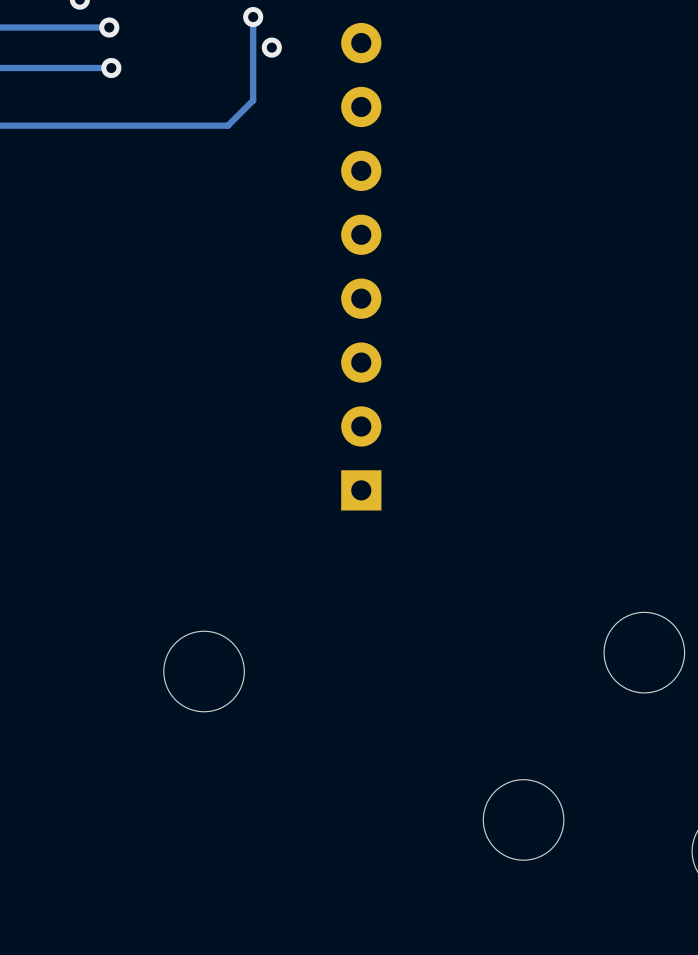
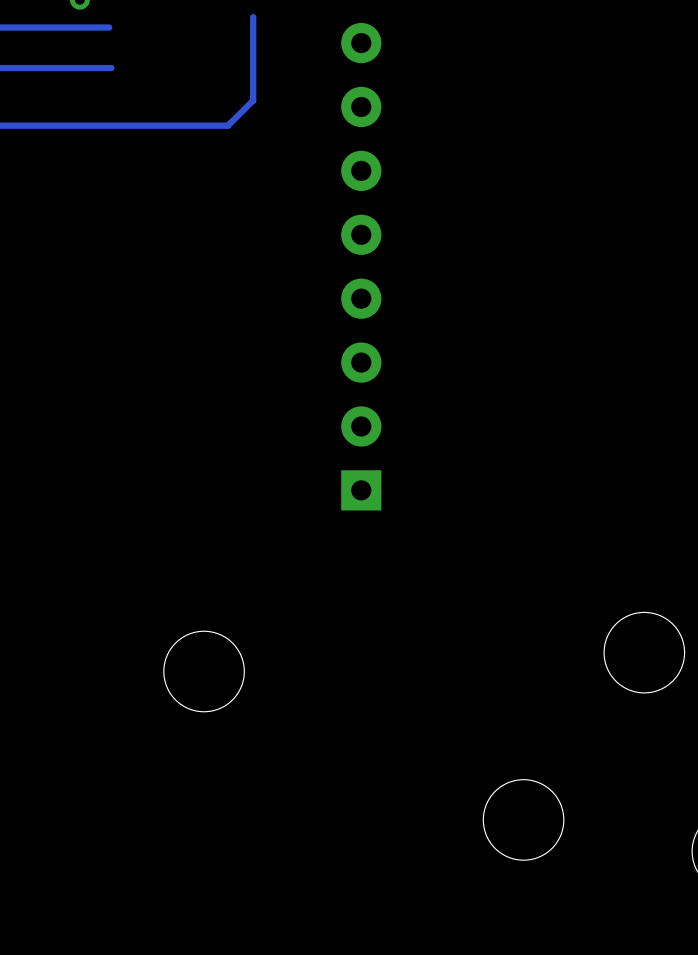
via: (253, 17) -> none
via: (109, 27) -> none
via: (271, 47) -> none
via: (111, 68) -> none

